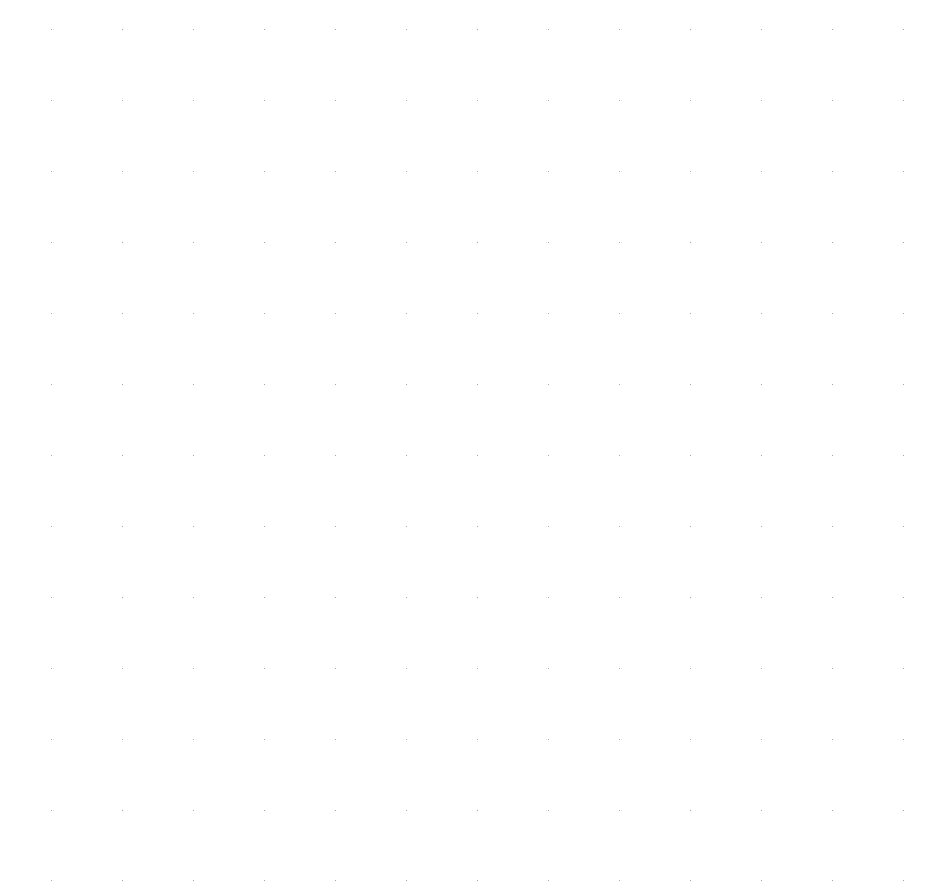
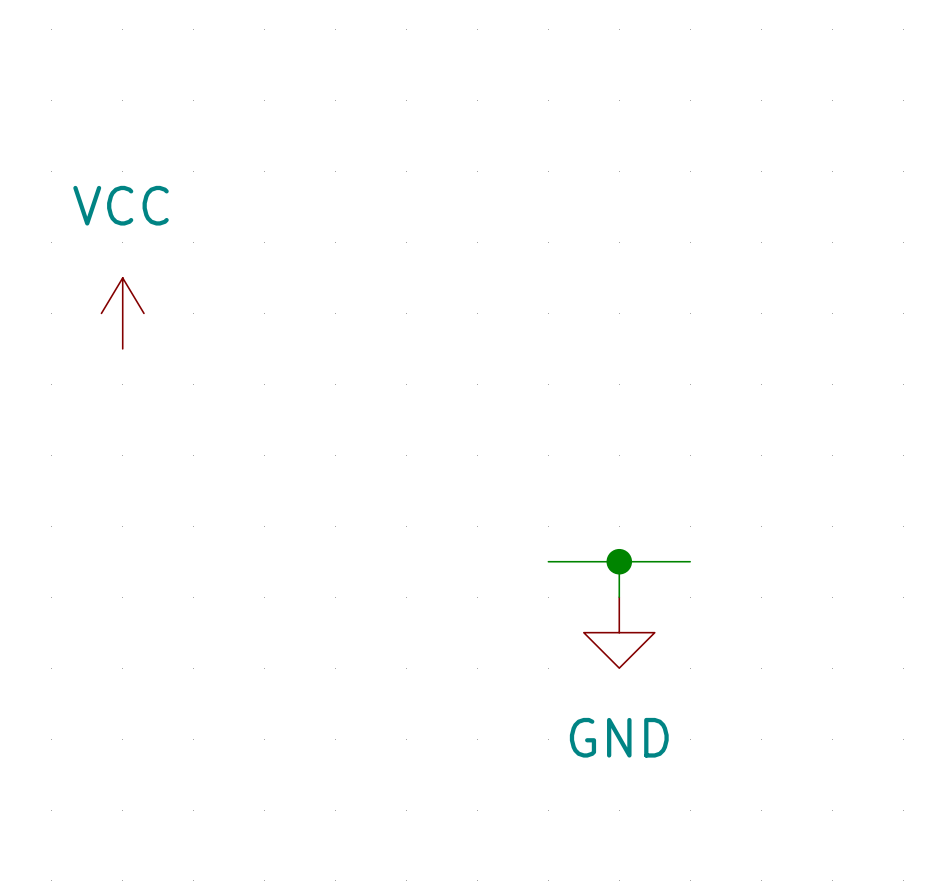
power symbol: none -> VCC (122, 313)
wire: none -> (548, 561) (690, 561)
wire: none -> (619, 561) (619, 597)
junction: none -> (619, 561)
power symbol: none -> GND (619, 632)

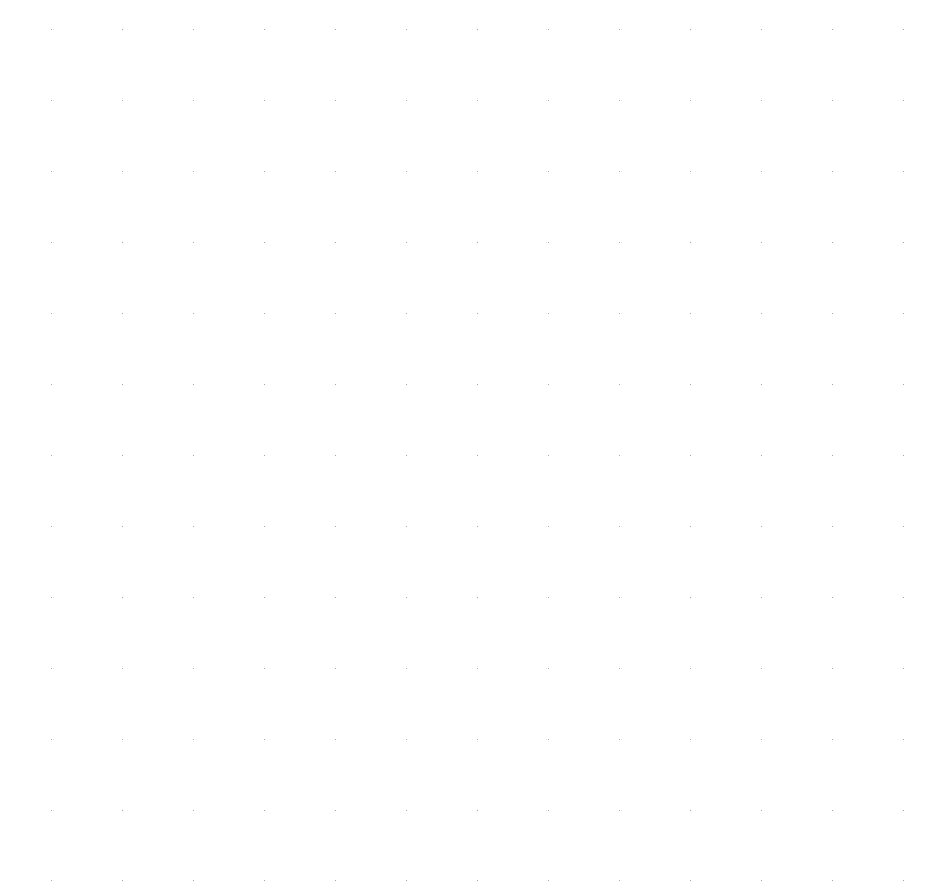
power symbol: VCC (122, 313) -> none
wire: (548, 561) (690, 561) -> none
wire: (619, 561) (619, 597) -> none
junction: (619, 561) -> none
power symbol: GND (619, 632) -> none

